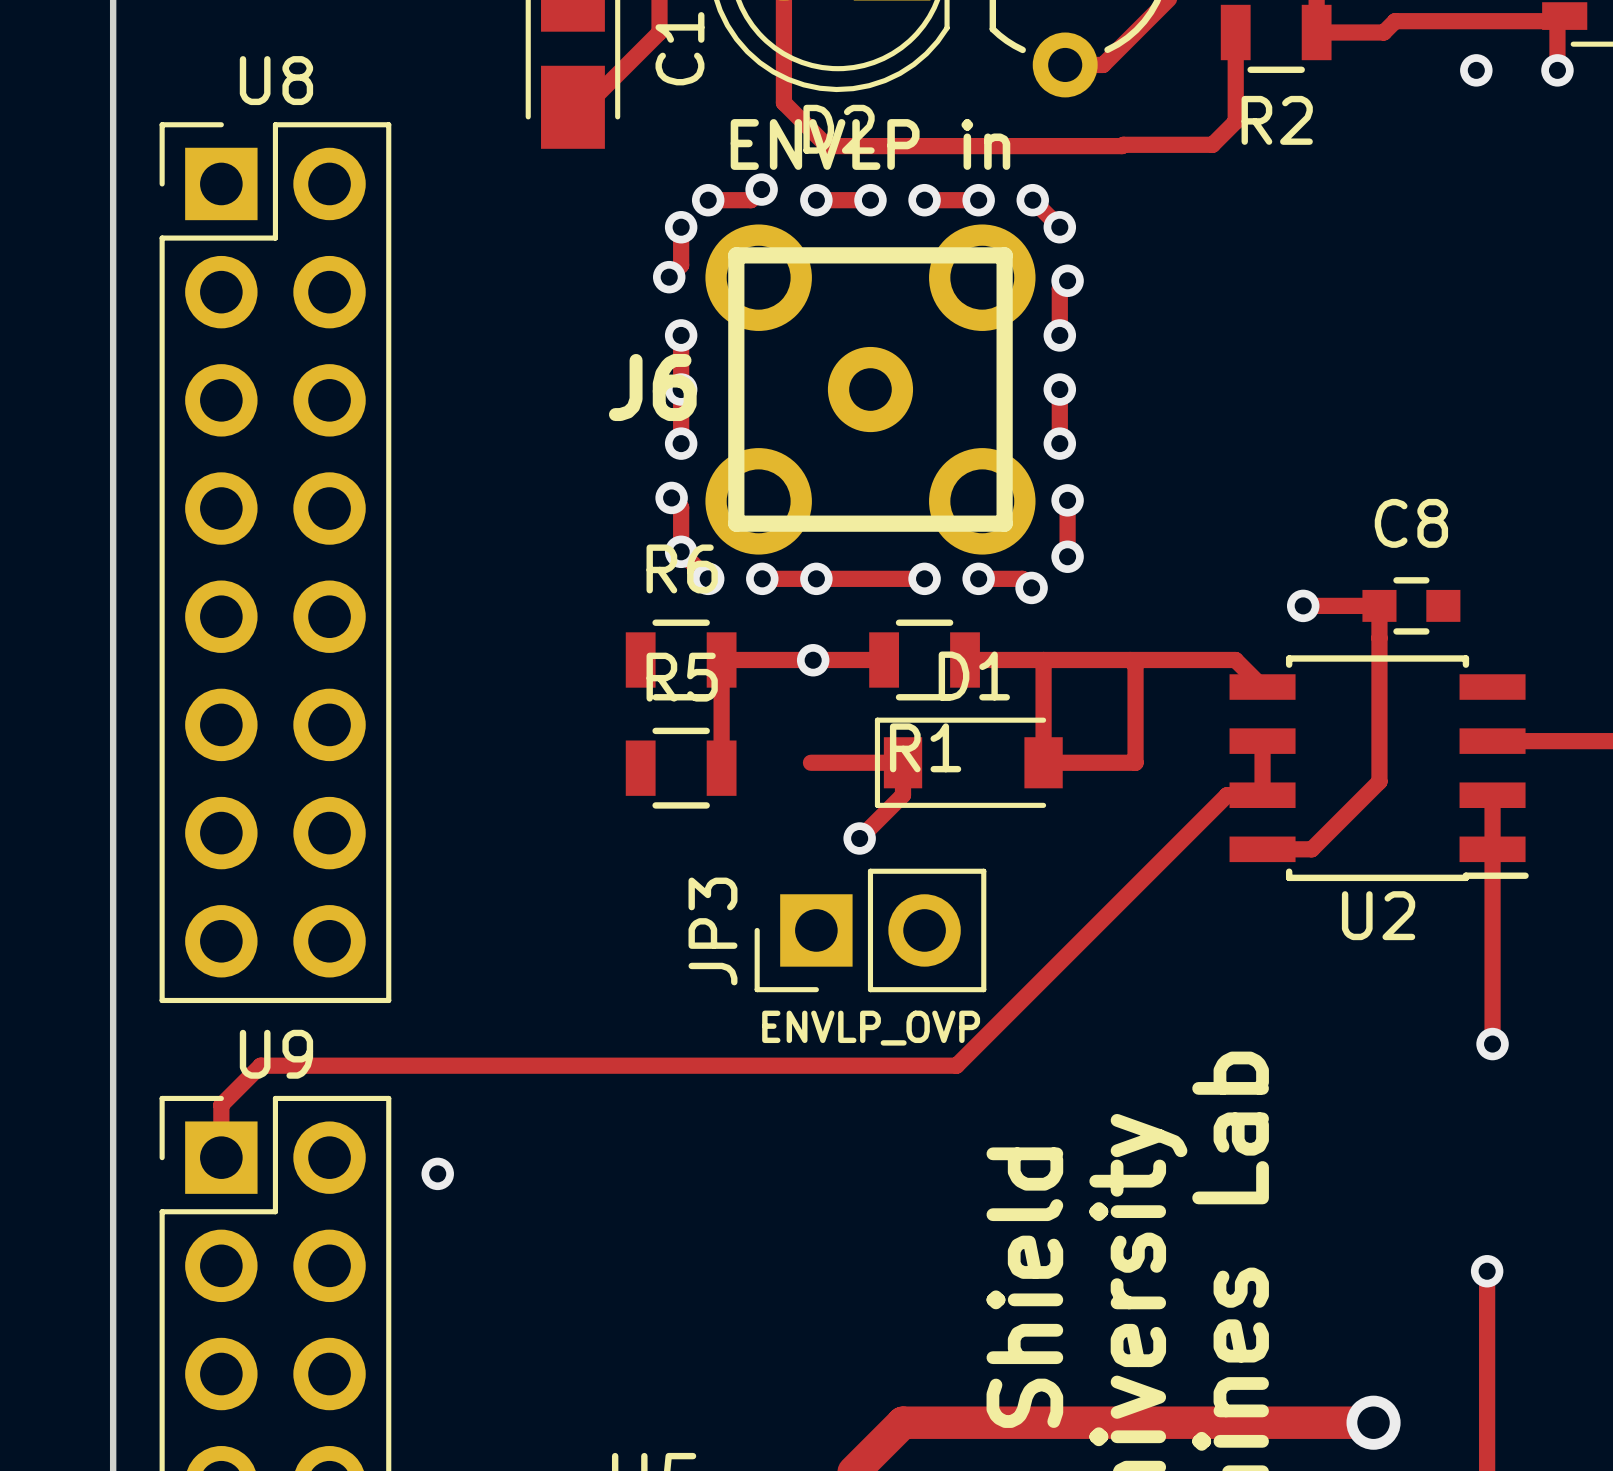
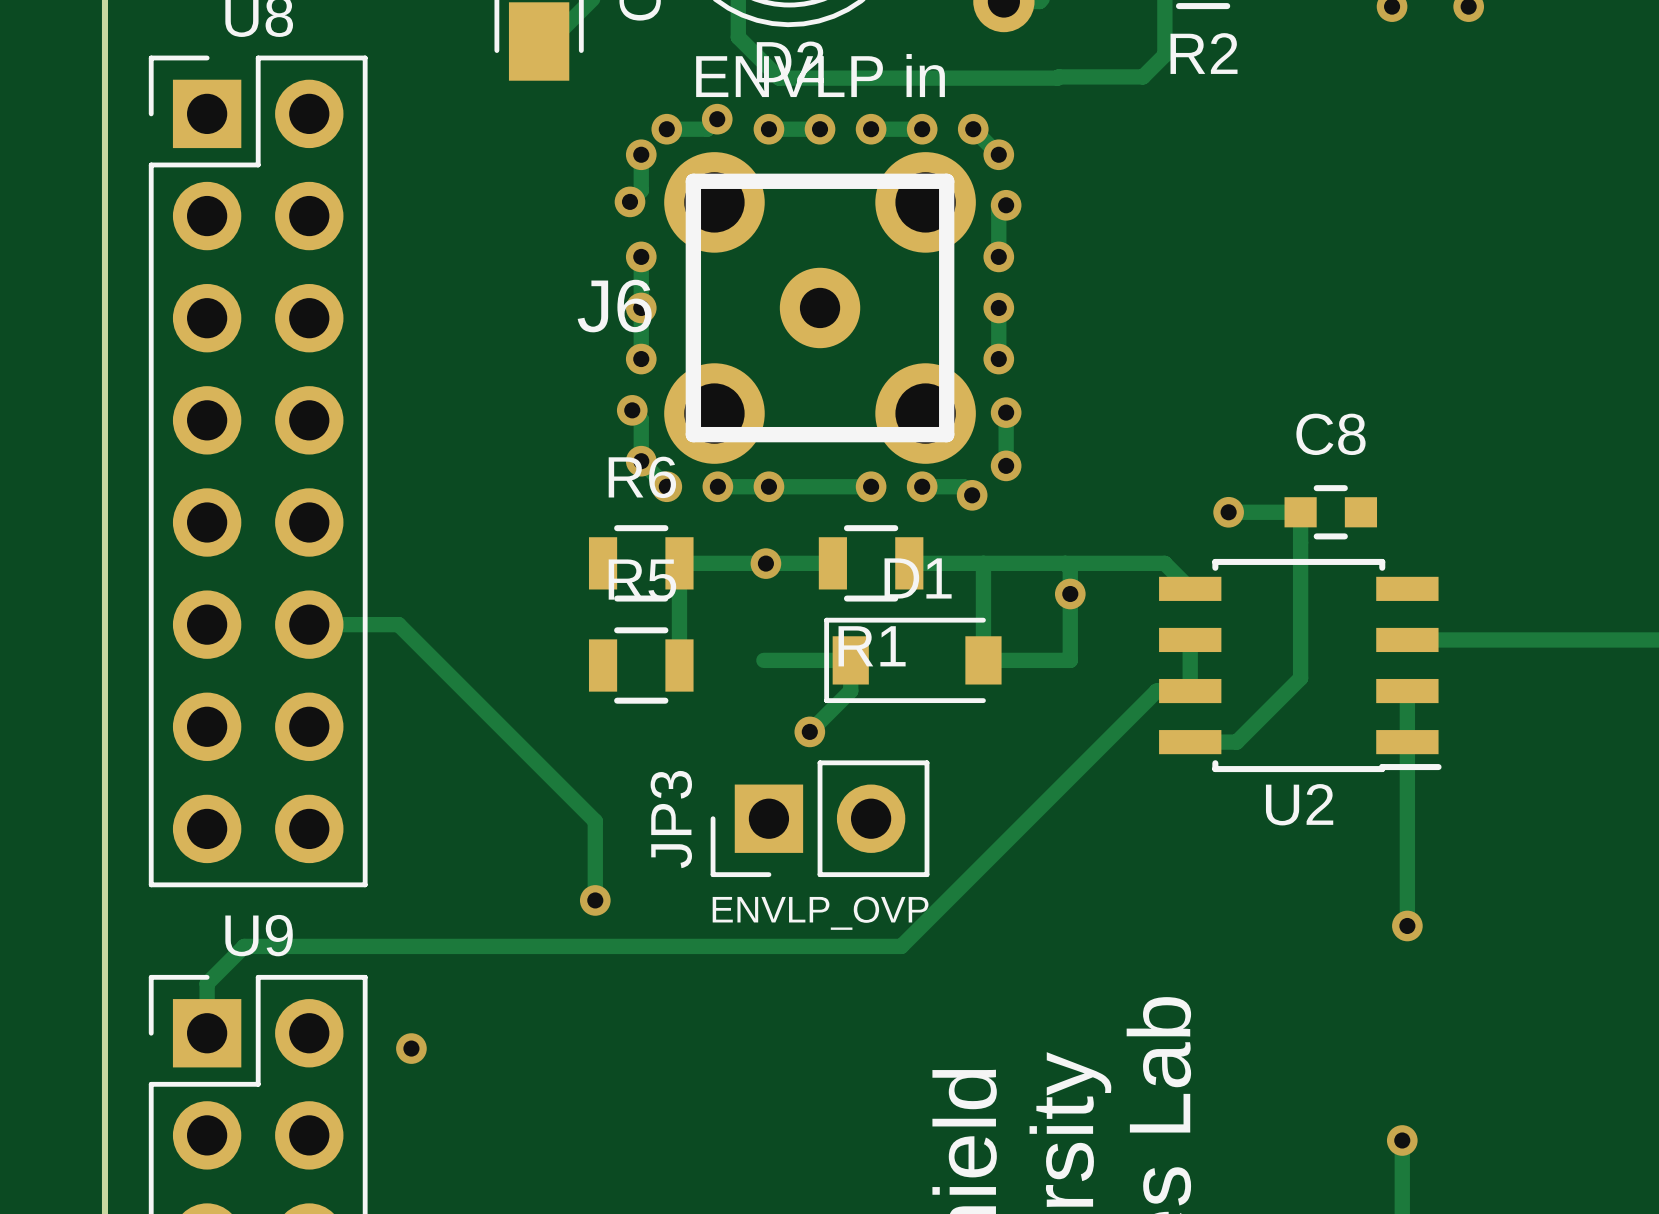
via: none -> (1070, 593)
track: none -> (309, 624) (398, 624) (595, 821) (595, 900)
via: none -> (595, 900)

